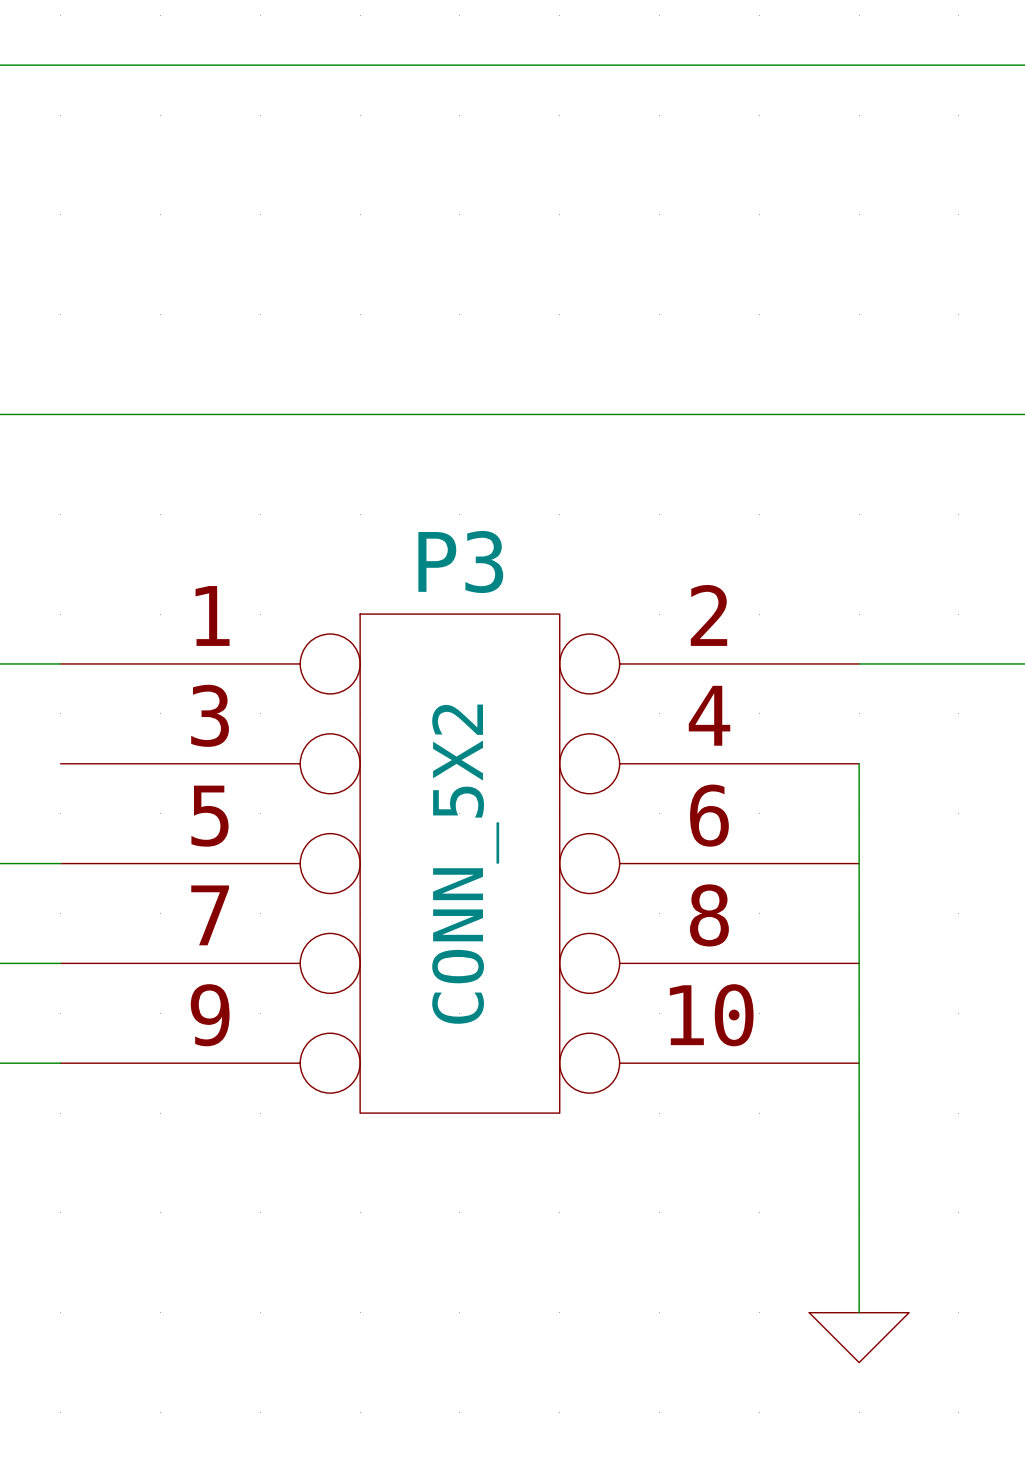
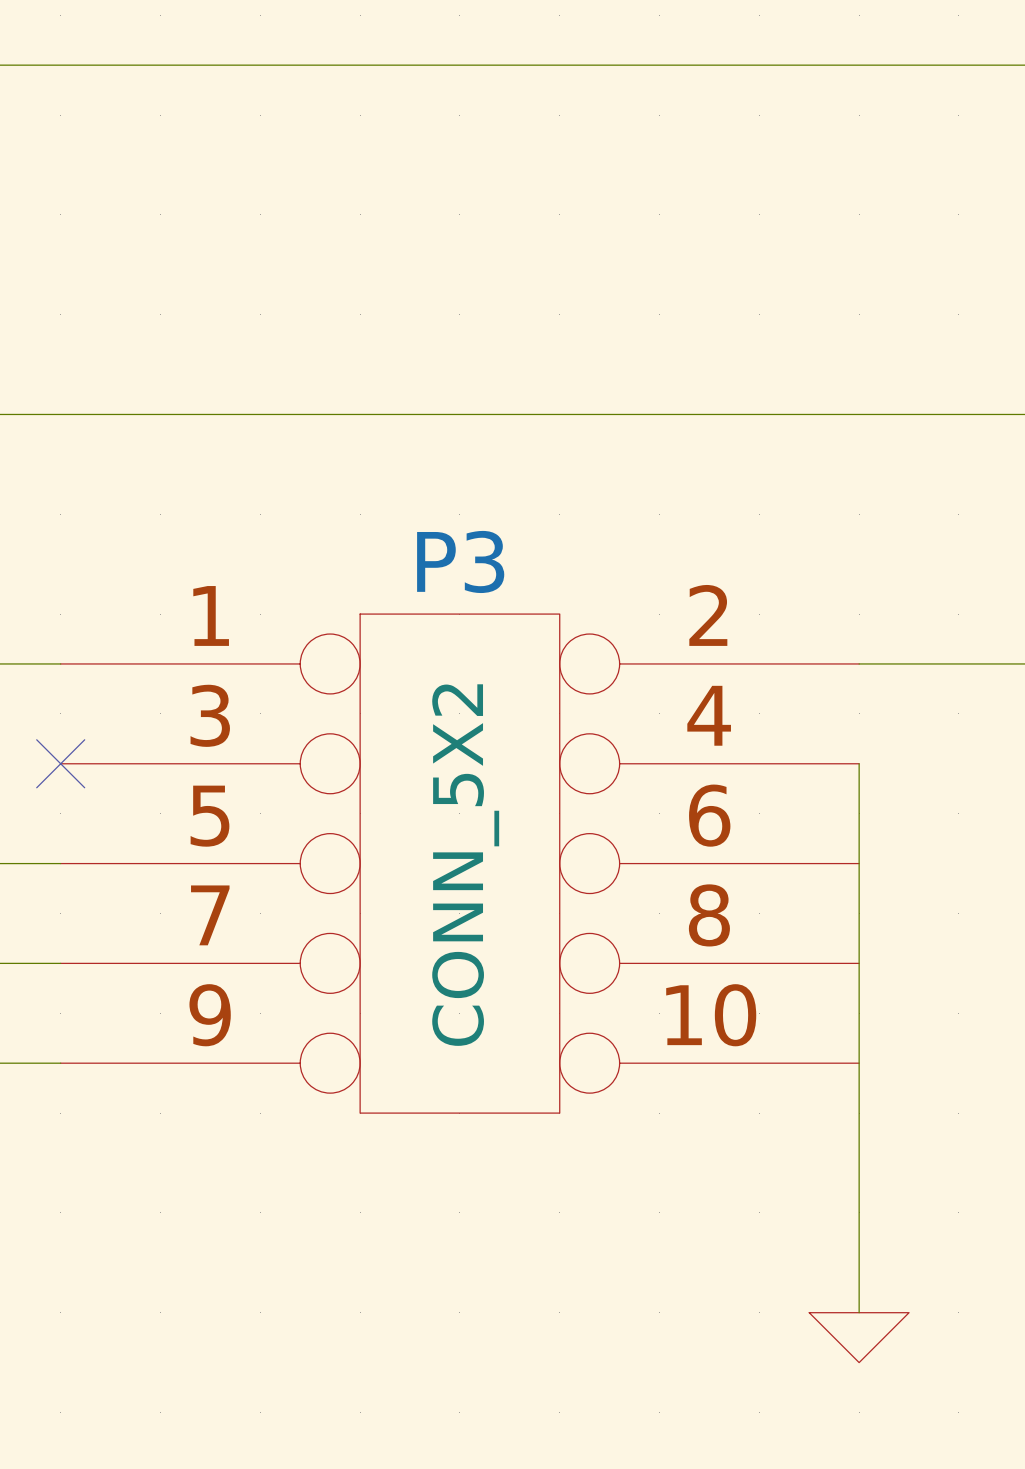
no-connect mark: none -> (60, 763)

